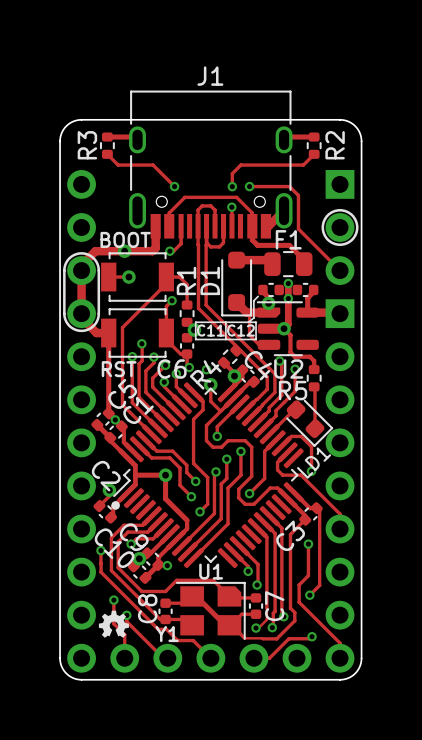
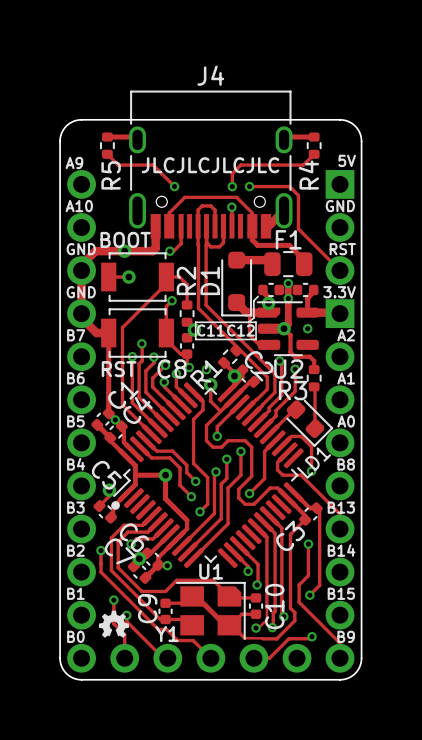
J1 name: J1 (210, 76) -> J4 (210, 75)
R3 name: R3 (87, 145) -> R5 (111, 175)
R2 name: R2 (335, 145) -> R4 (308, 175)
text: none -> 5V (347, 160)
text: none -> A9 (74, 163)
text: none -> JLCJLCJLCJLC (210, 165)
text: none -> A10 (79, 206)
text: none -> GND (340, 206)
drawing: [321, 209, 359, 247] -> none
text: none -> GND (81, 249)
text: none -> RST (342, 249)
line: (64, 270) (65, 319) (73, 328) (87, 329) (95, 323) (98, 315) (97, 263) (90, 255) (77, 253) (67, 260) (64, 270) -> none
R1 name: R1 (186, 280) -> R2 (186, 280)
text: none -> GND (81, 292)
text: none -> 3.3V (339, 292)
line: (225, 322) (225, 339) -> none
via: none -> (307, 328)
text: none -> B7 (76, 335)
text: none -> A2 (346, 335)
C4 name: C4 (258, 365) -> C2 (259, 366)
C6 name: C6 (172, 369) -> C8 (172, 369)
R4 name: R4 (205, 374) -> R1 (206, 374)
text: none -> B6 (75, 378)
text: none -> A1 (346, 378)
R5 name: R5 (293, 390) -> R3 (293, 390)
C5 name: C5 (122, 393) -> C1 (123, 395)
C1 name: C1 (138, 410) -> C4 (137, 410)
text: none -> B5 (75, 421)
text: none -> A0 (346, 421)
text: none -> B4 (76, 464)
text: none -> B8 (346, 464)
C2 name: C2 (106, 476) -> C5 (106, 475)
text: none -> B3 (75, 507)
text: none -> B13 (341, 507)
C9 name: C9 (134, 537) -> C6 (134, 537)
C10 name: C10 (114, 548) -> C7 (120, 551)
text: none -> B2 (75, 550)
text: none -> B14 (341, 550)
text: none -> B1 (75, 593)
text: none -> B15 (341, 593)
C7 name: C7 (274, 606) -> C10 (274, 606)
C8 name: C8 (147, 608) -> C9 (147, 608)
text: none -> B0 (75, 636)
text: none -> B9 (346, 636)

